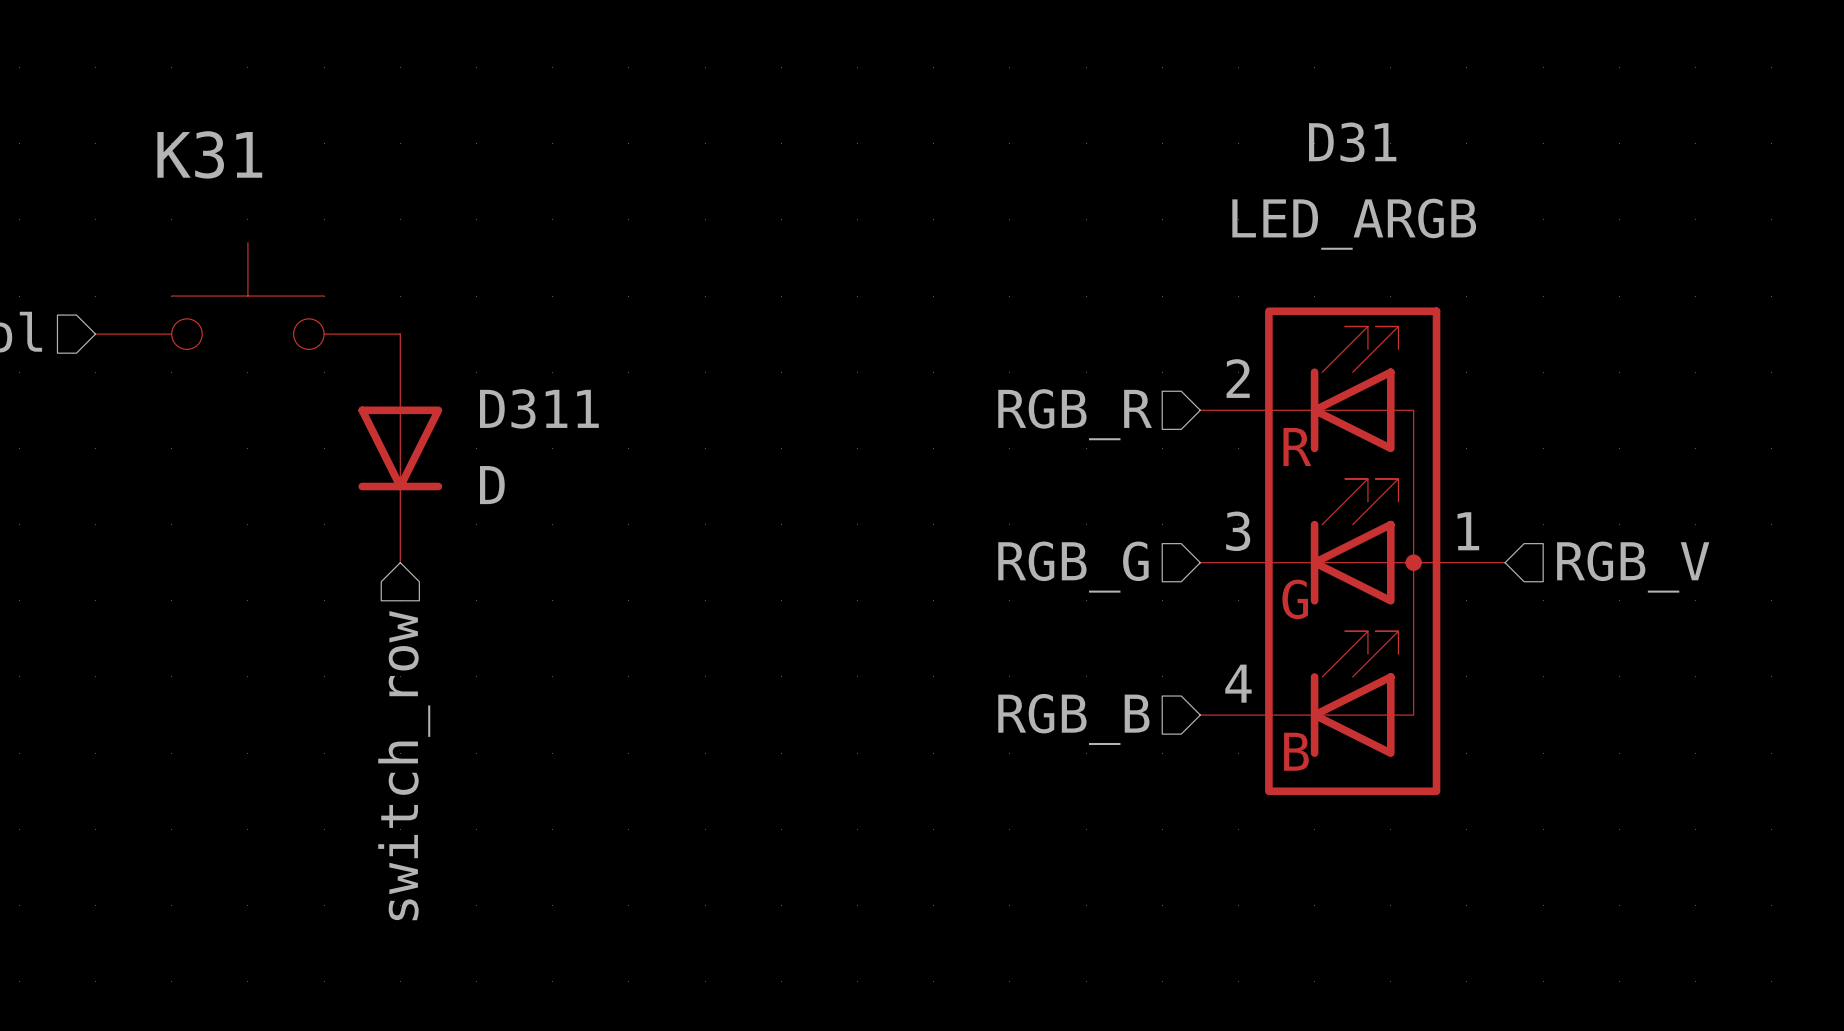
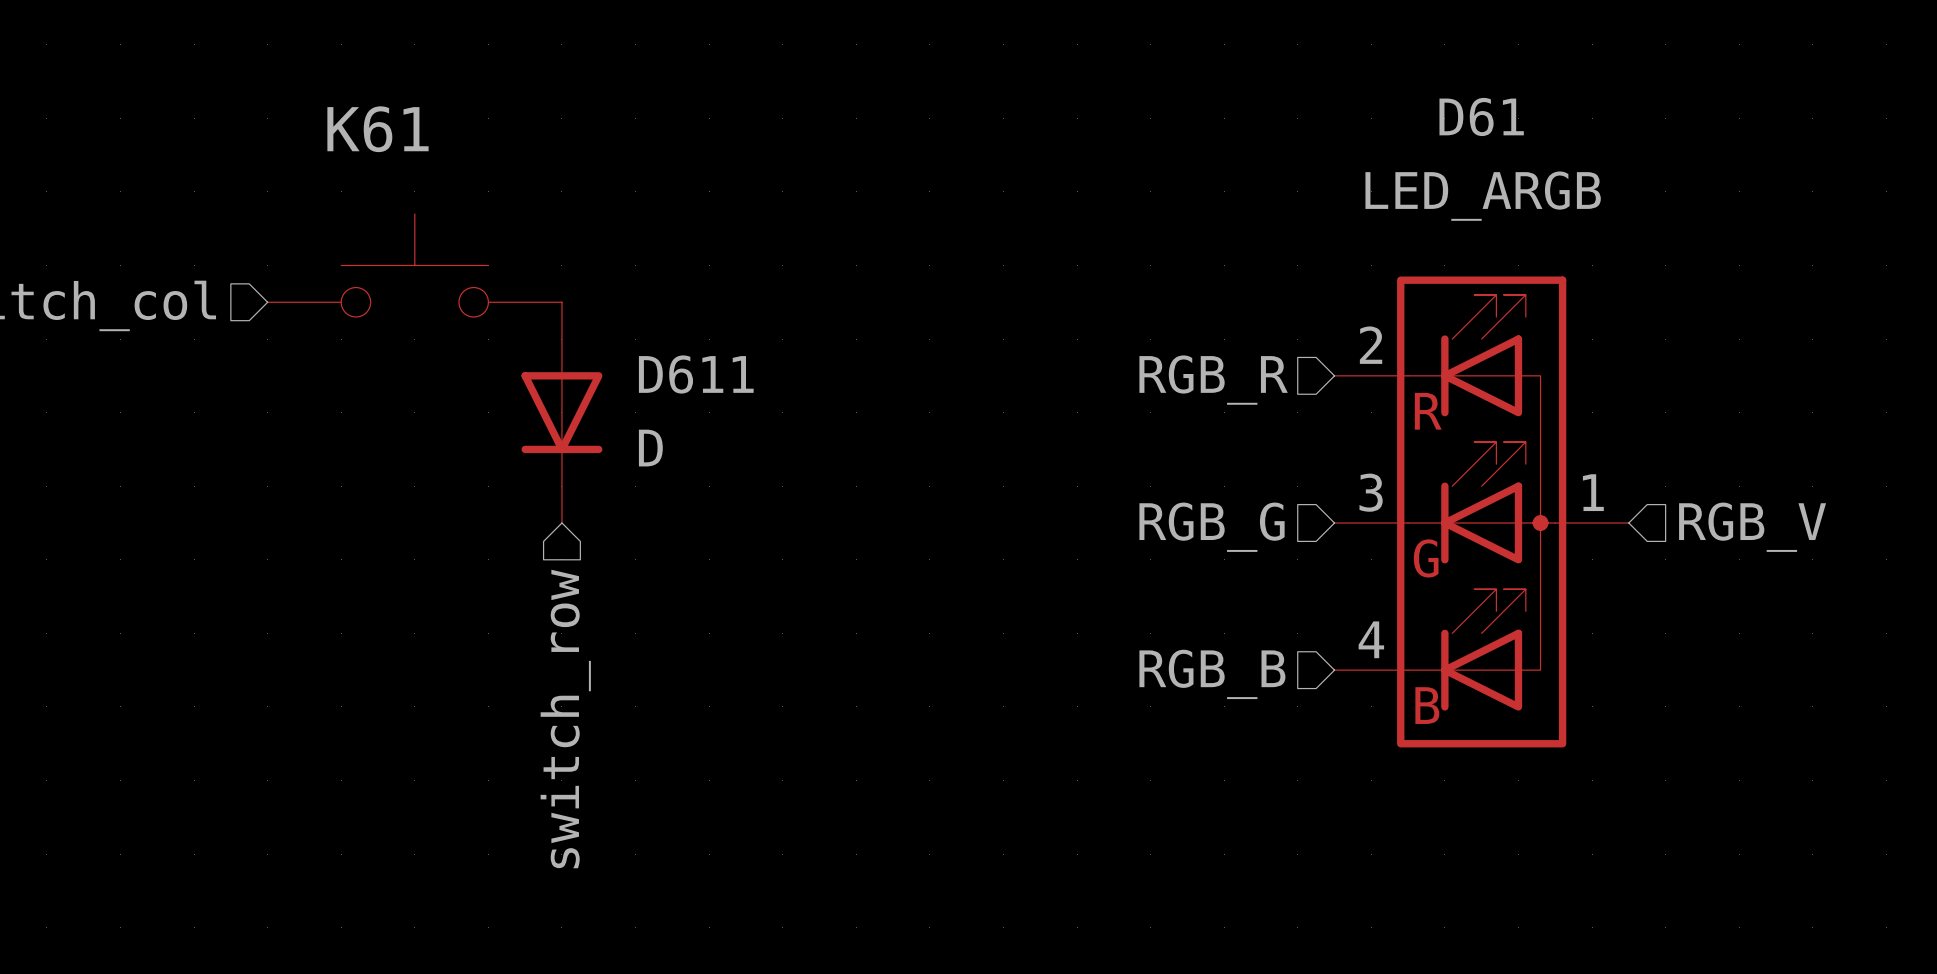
D31 name: D31 (1352, 142) -> D61 (1481, 116)
K31 name: K31 (209, 154) -> K61 (377, 129)
D311 name: D311 (539, 408) -> D611 (696, 374)

